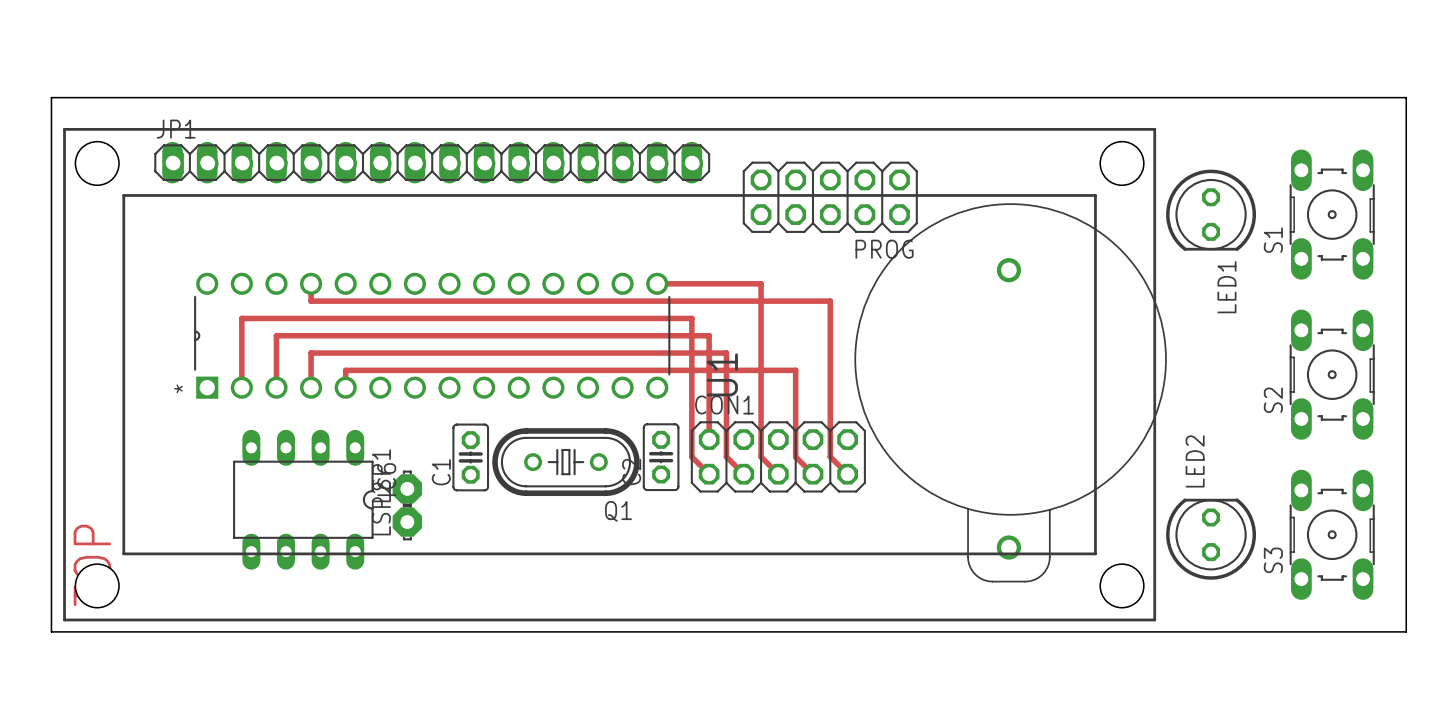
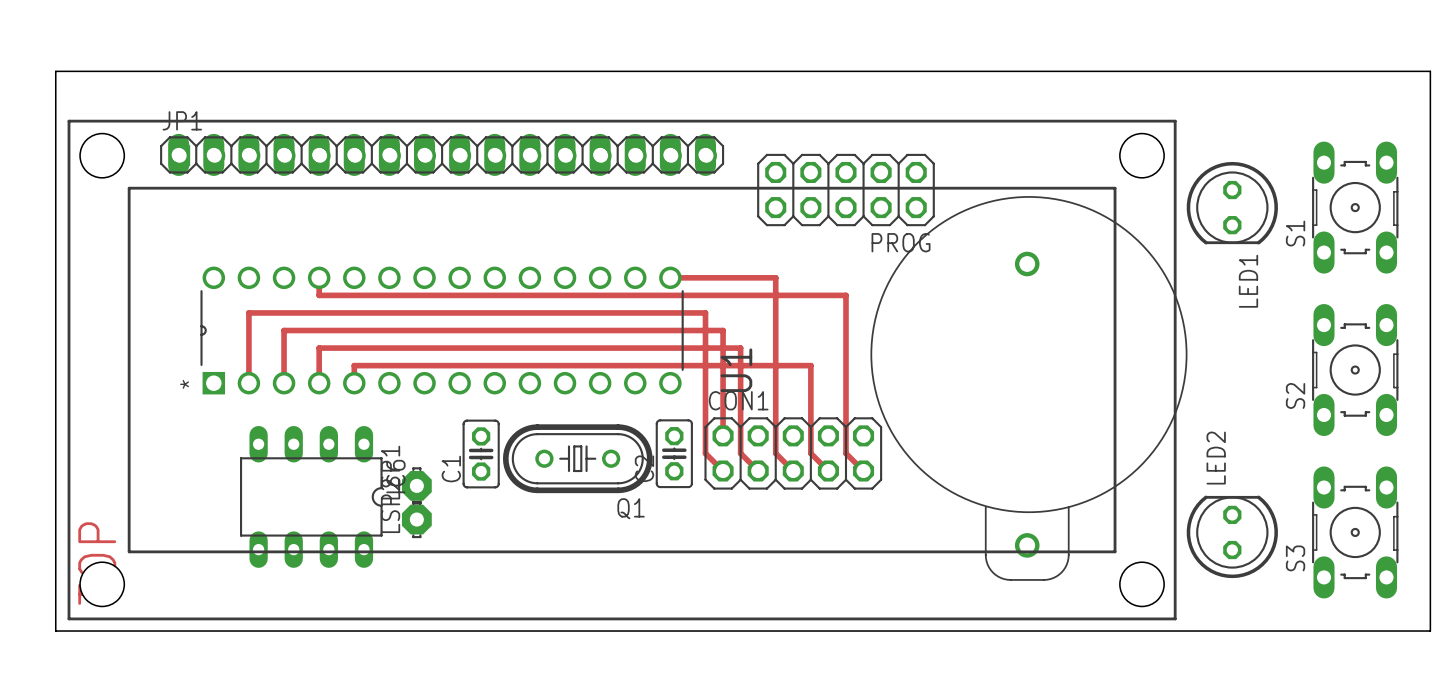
board edge: (51, 97) (1406, 97) -> (55, 88) (55, 71) (1430, 71) (1430, 88)

